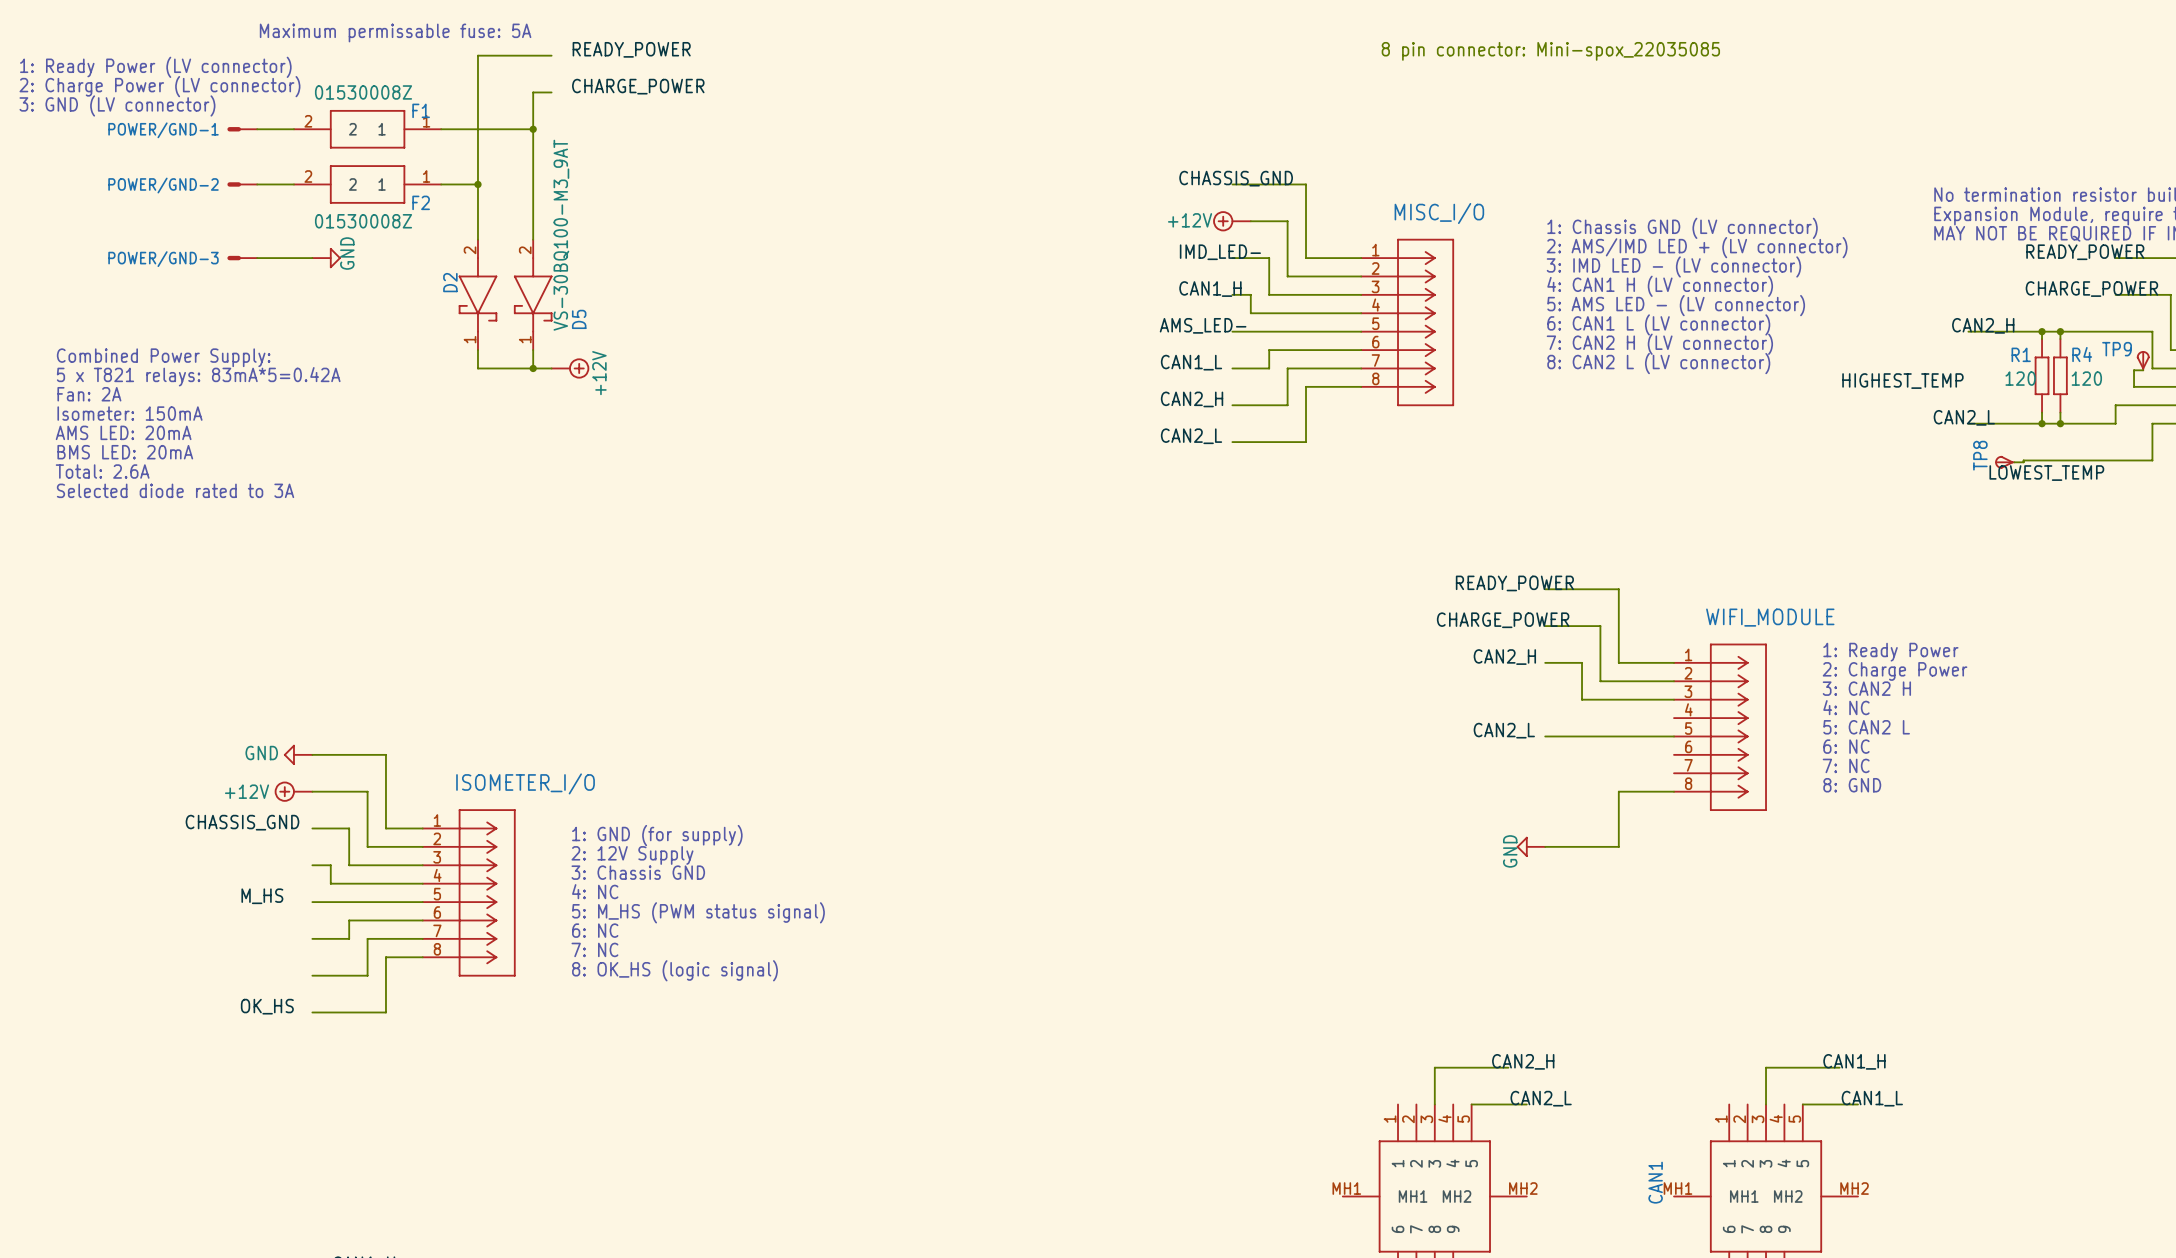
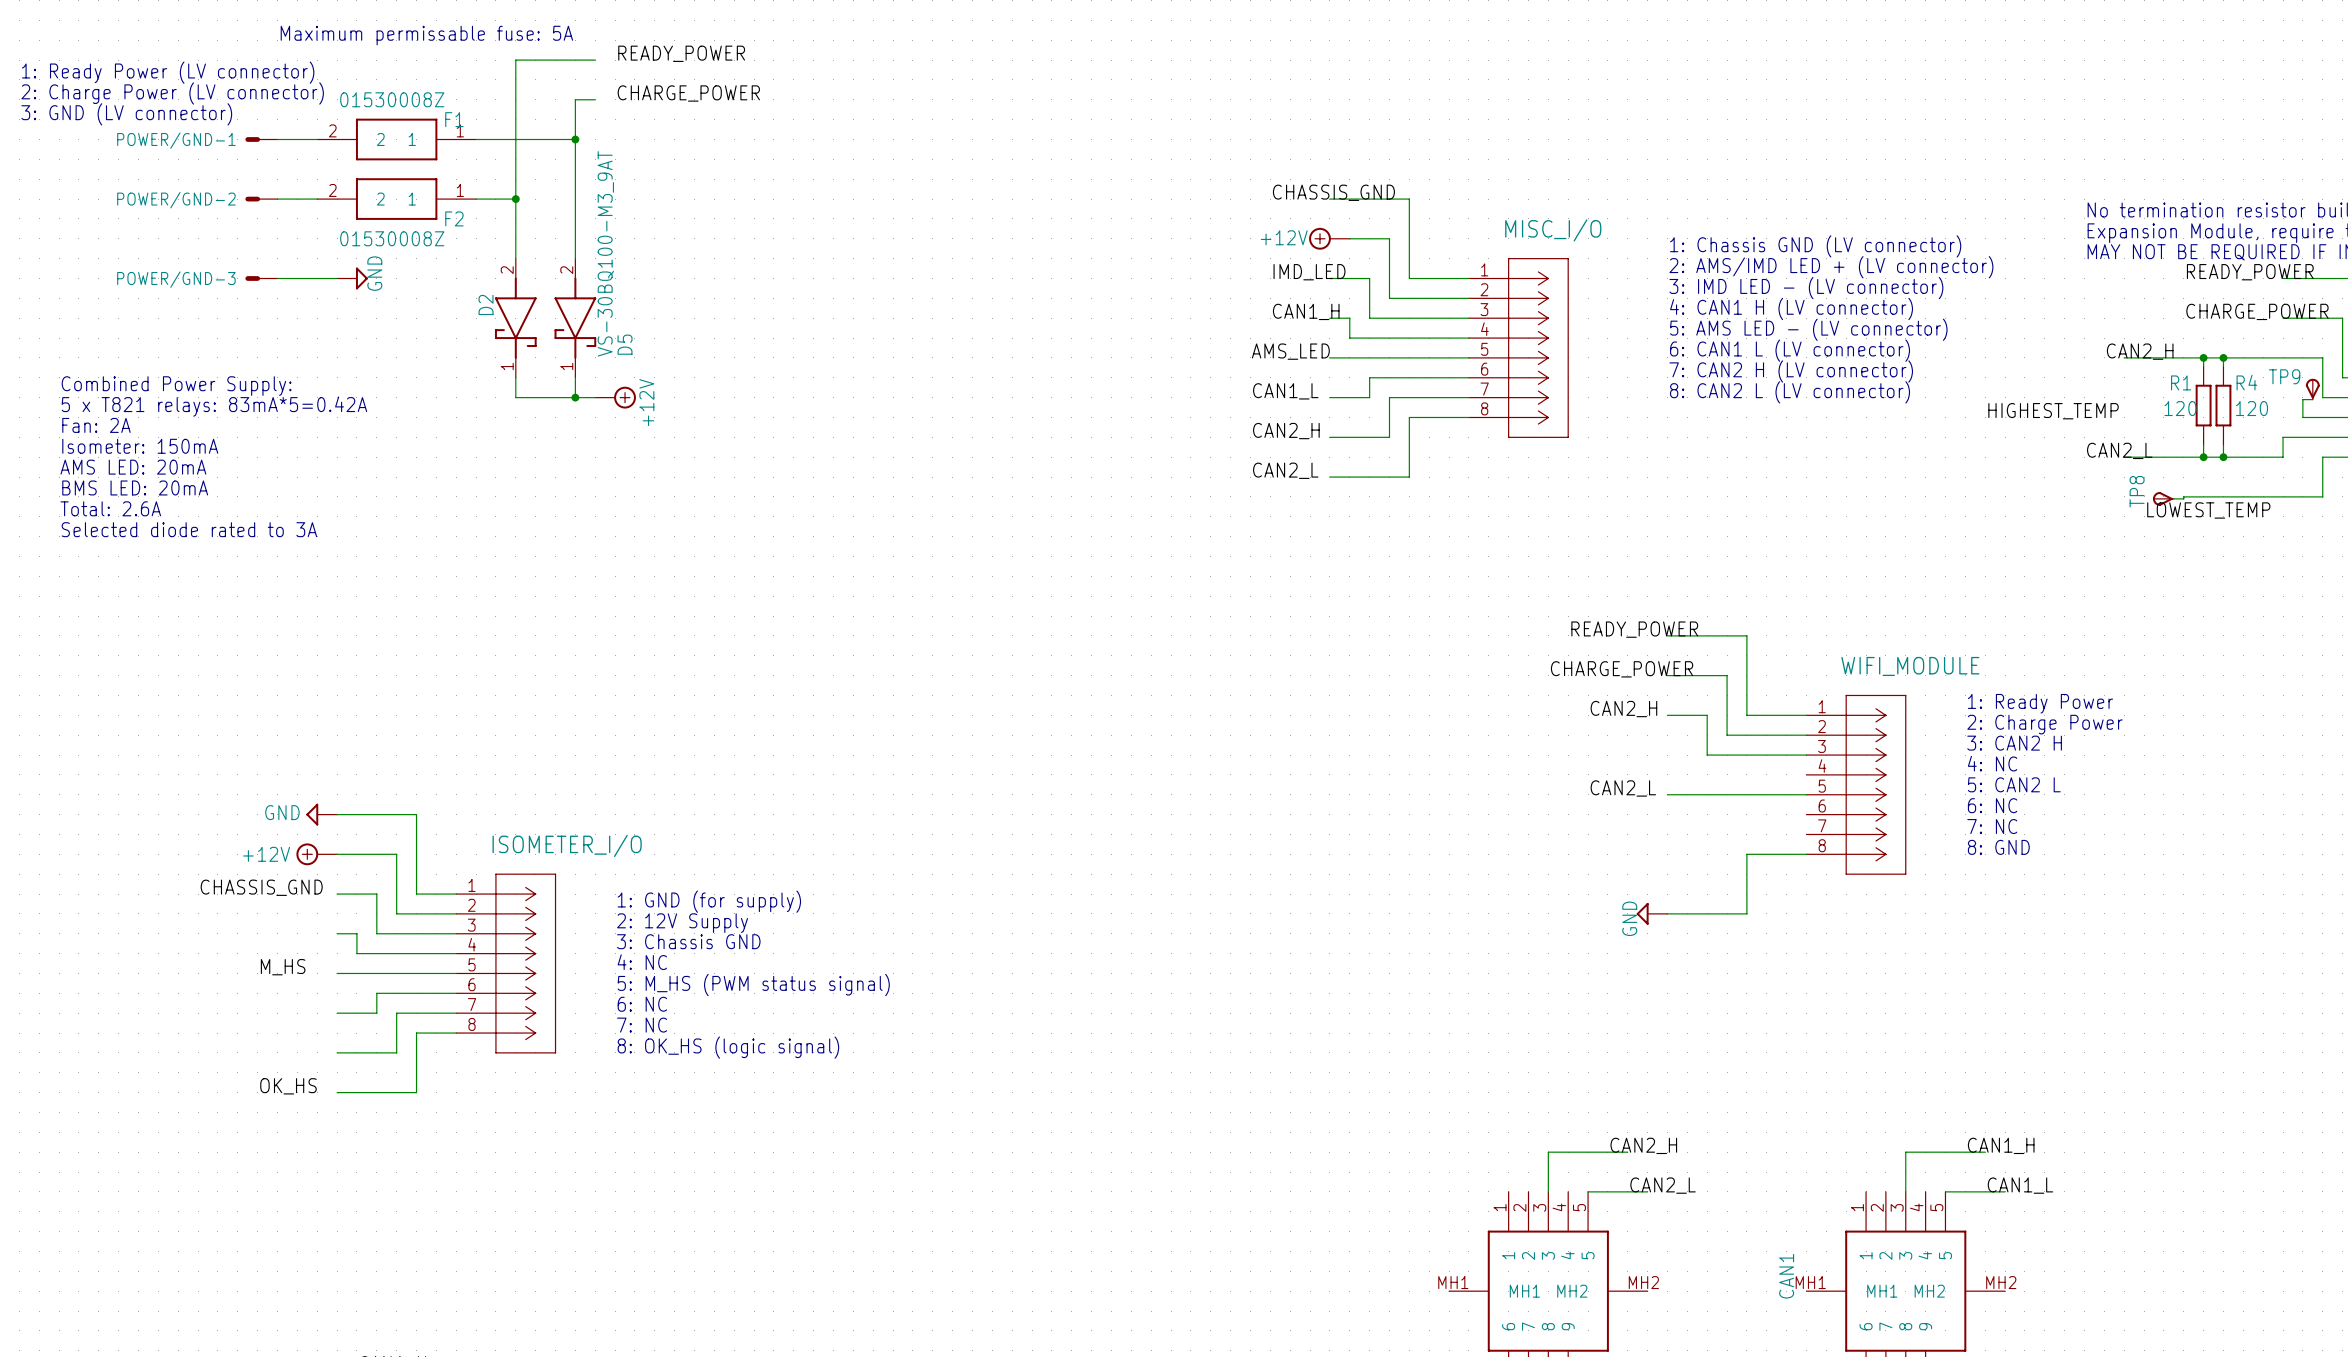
text: 8 pin connector: Mini-spox_22035085 (1550, 51) -> none
label: IMD_LED- (1220, 252) -> IMD_LED (1309, 272)
label: AMS_LED- (1203, 325) -> AMS_LED (1290, 351)

